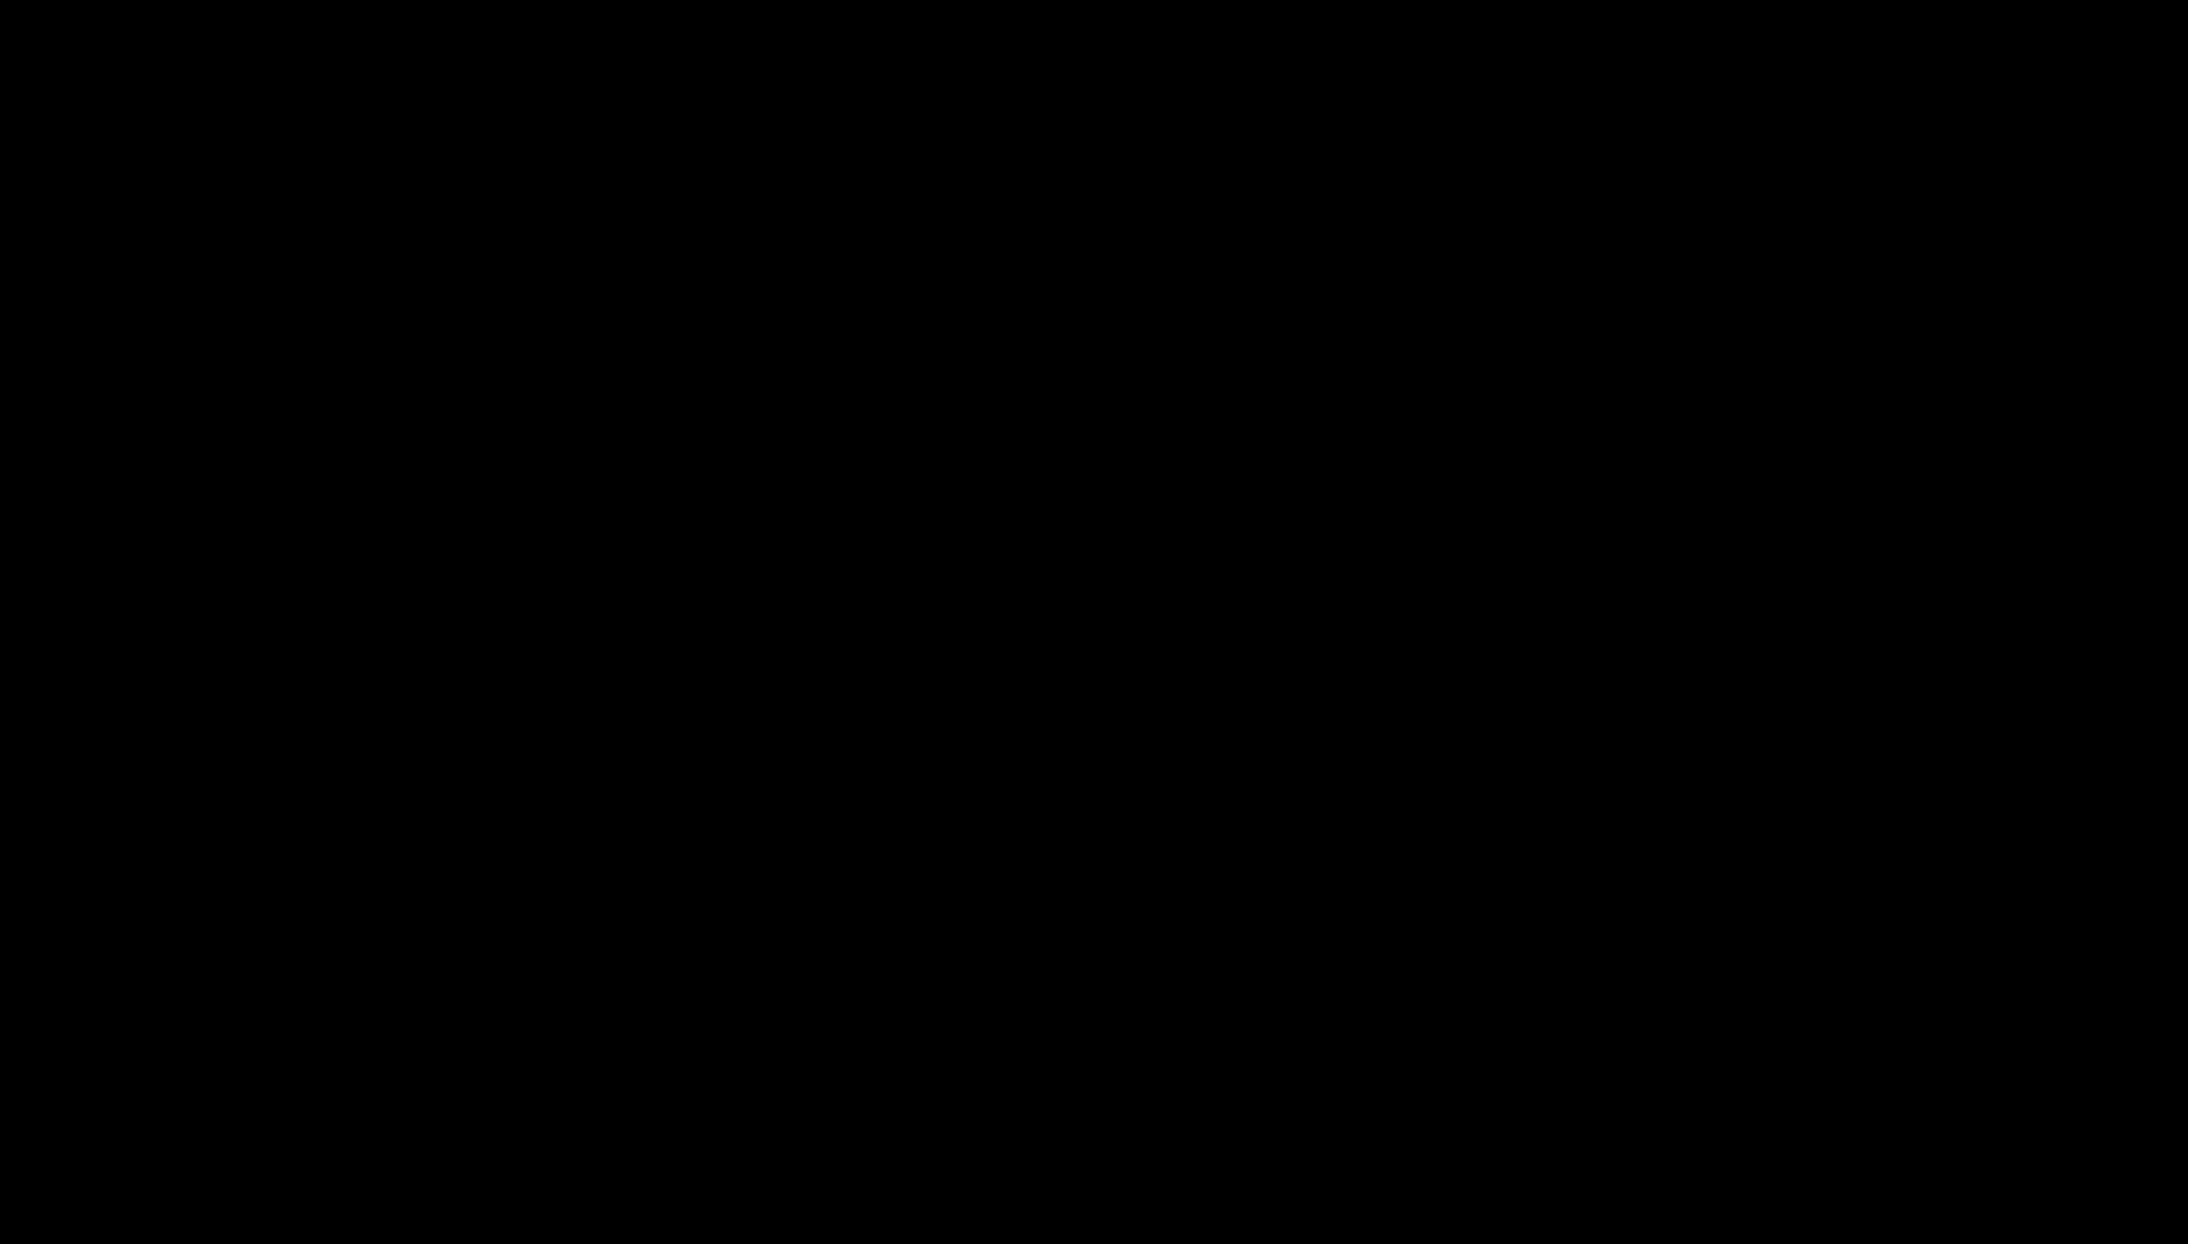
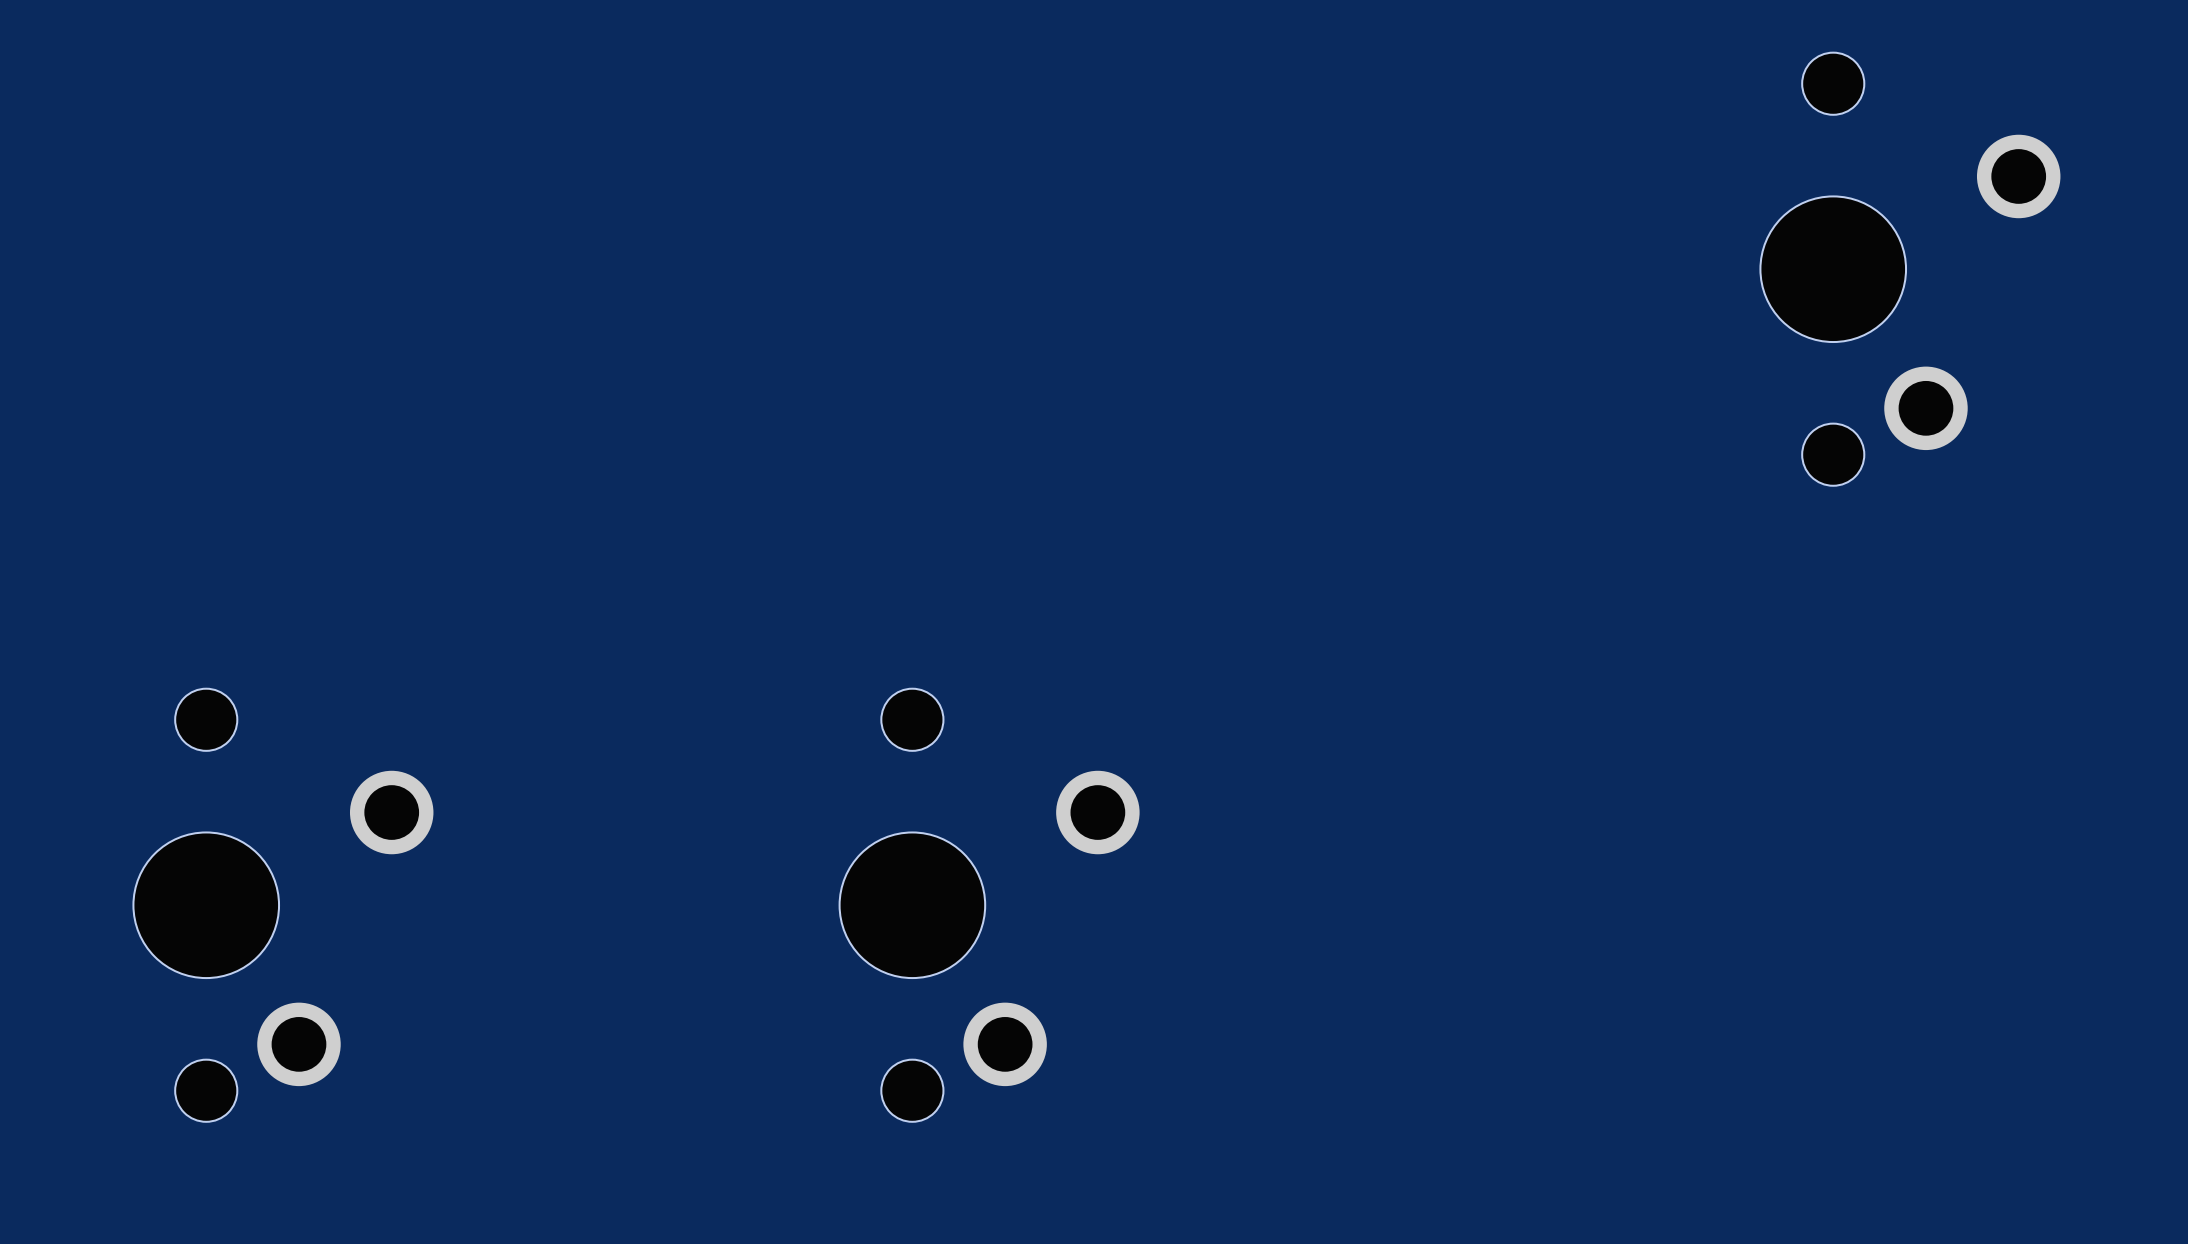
part: none -> (1910, 269)
part: none -> (283, 905)
part: none -> (989, 905)

